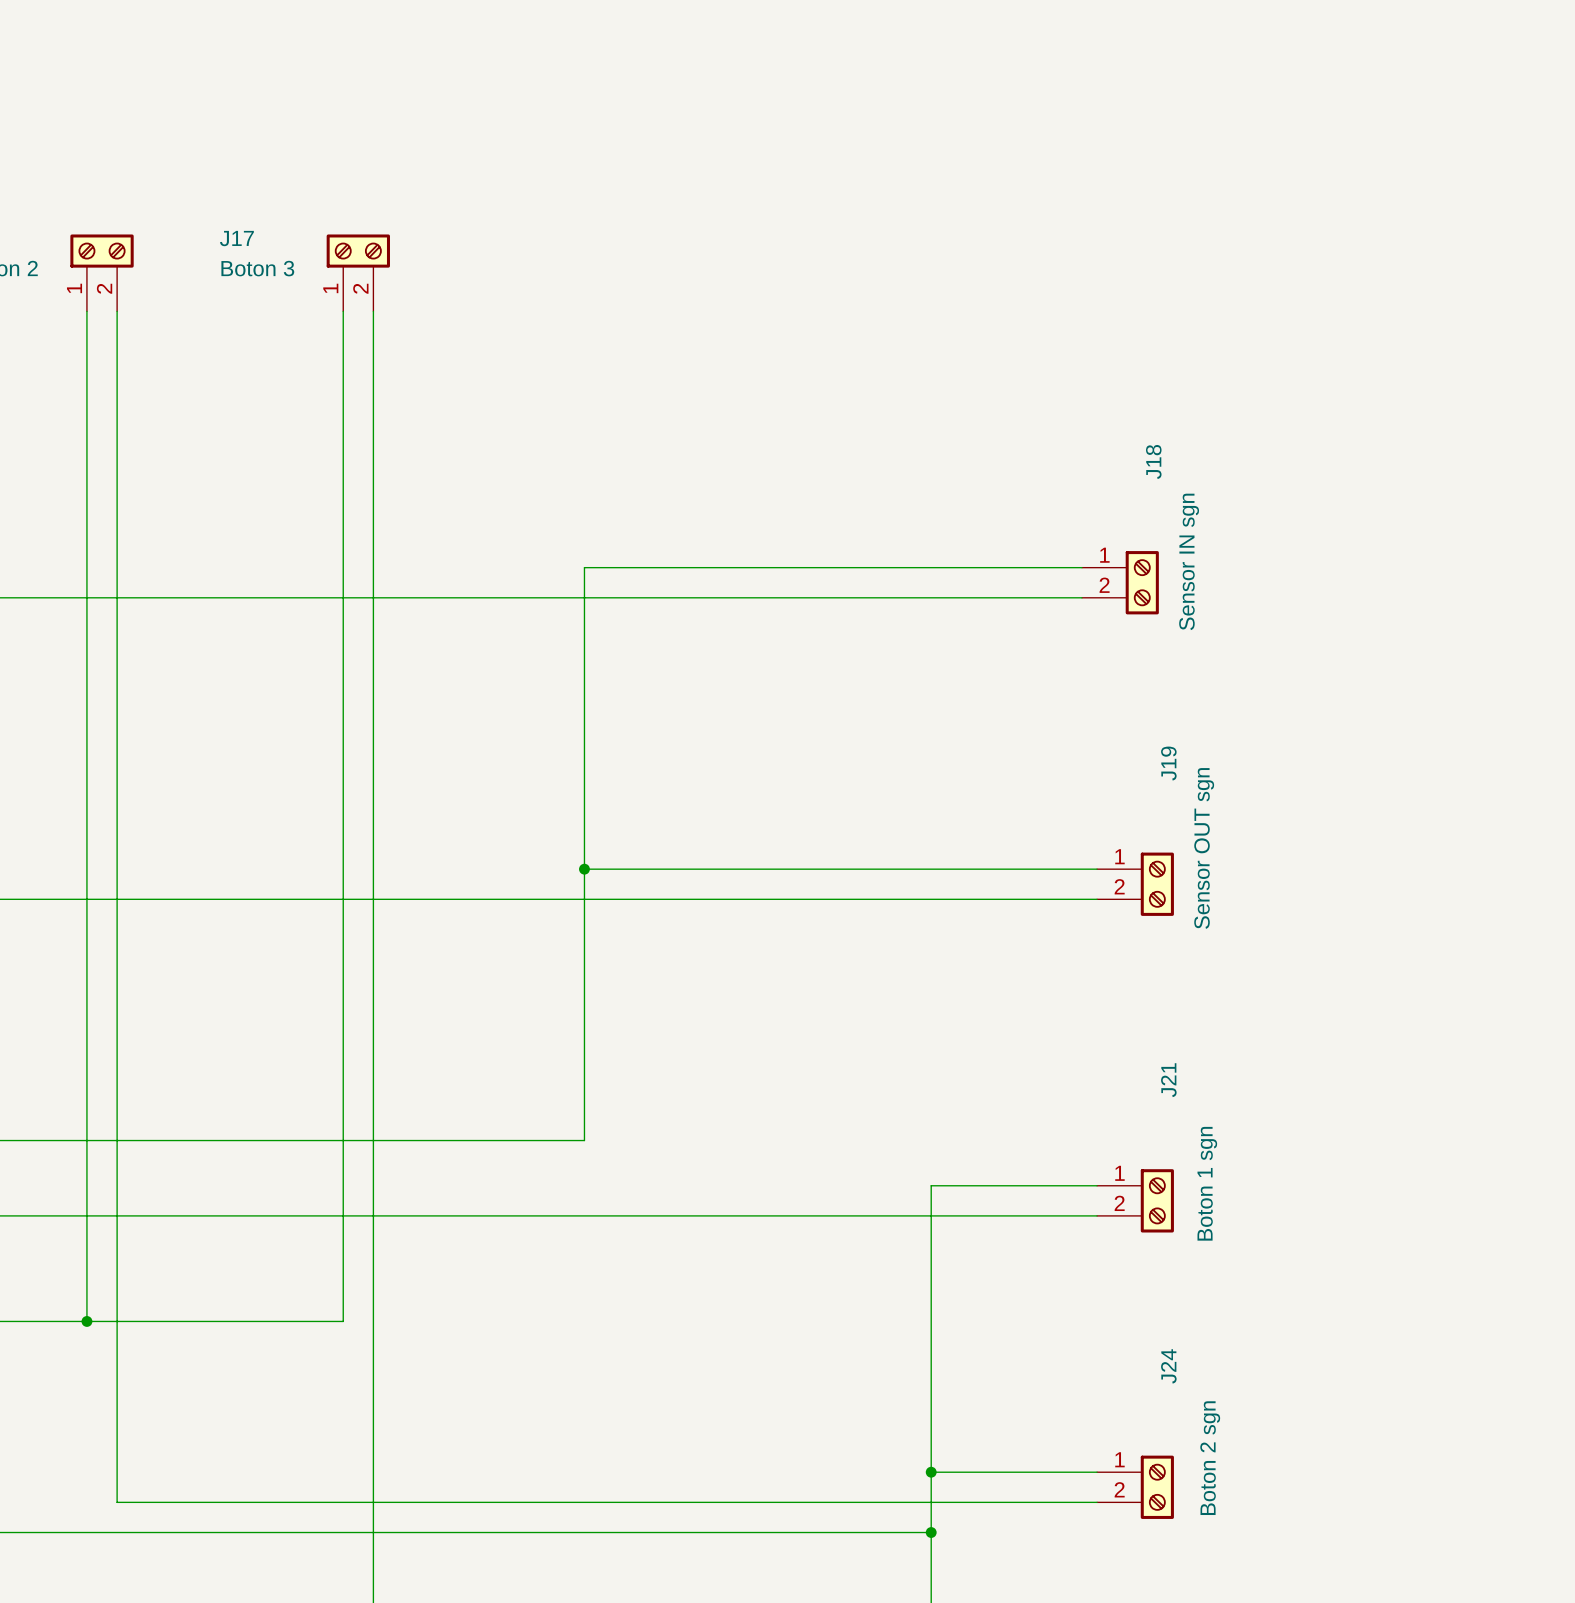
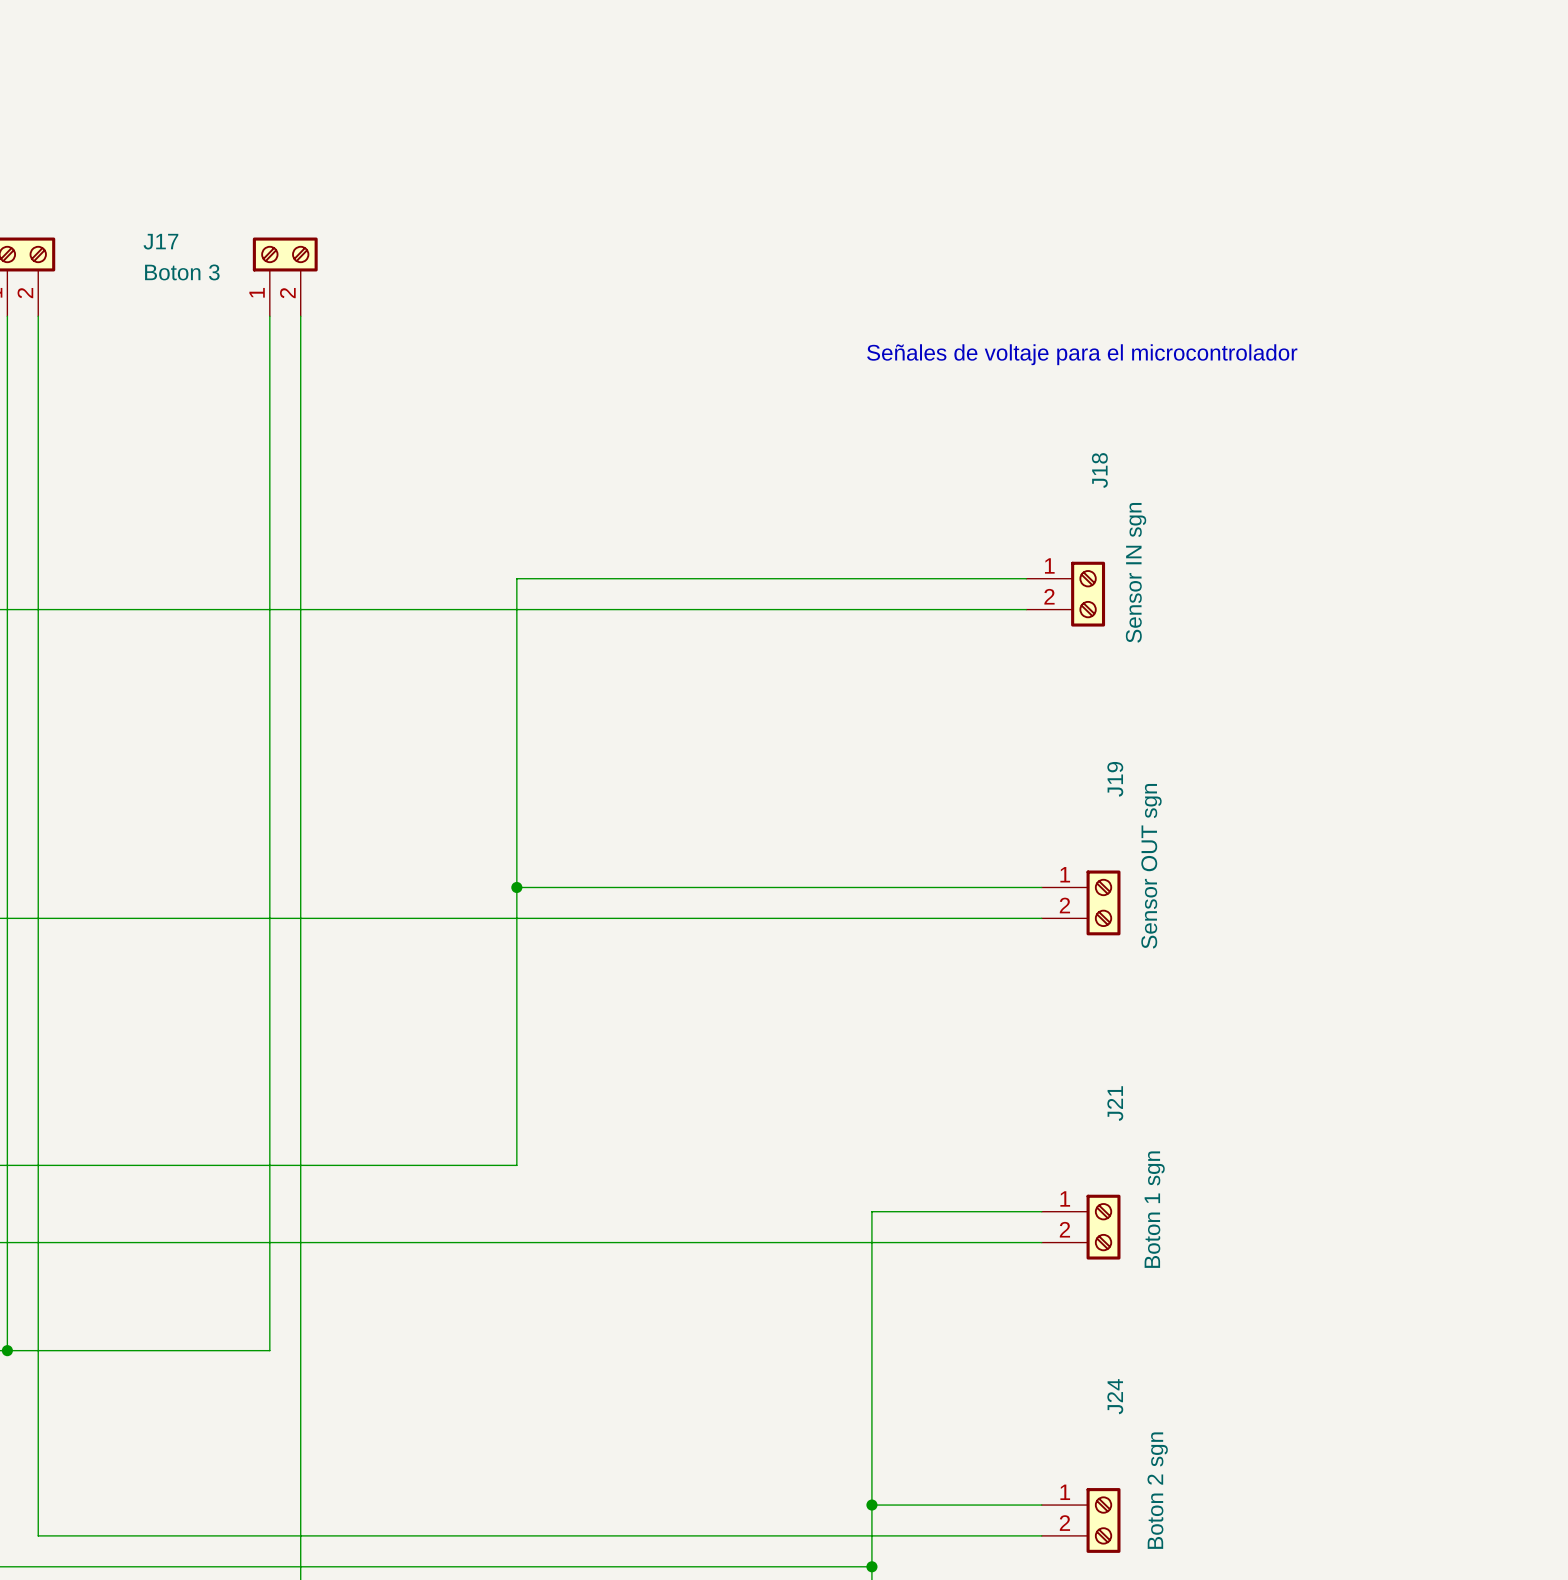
text: none -> Señales de voltaje para el microcontrolador (1082, 354)

